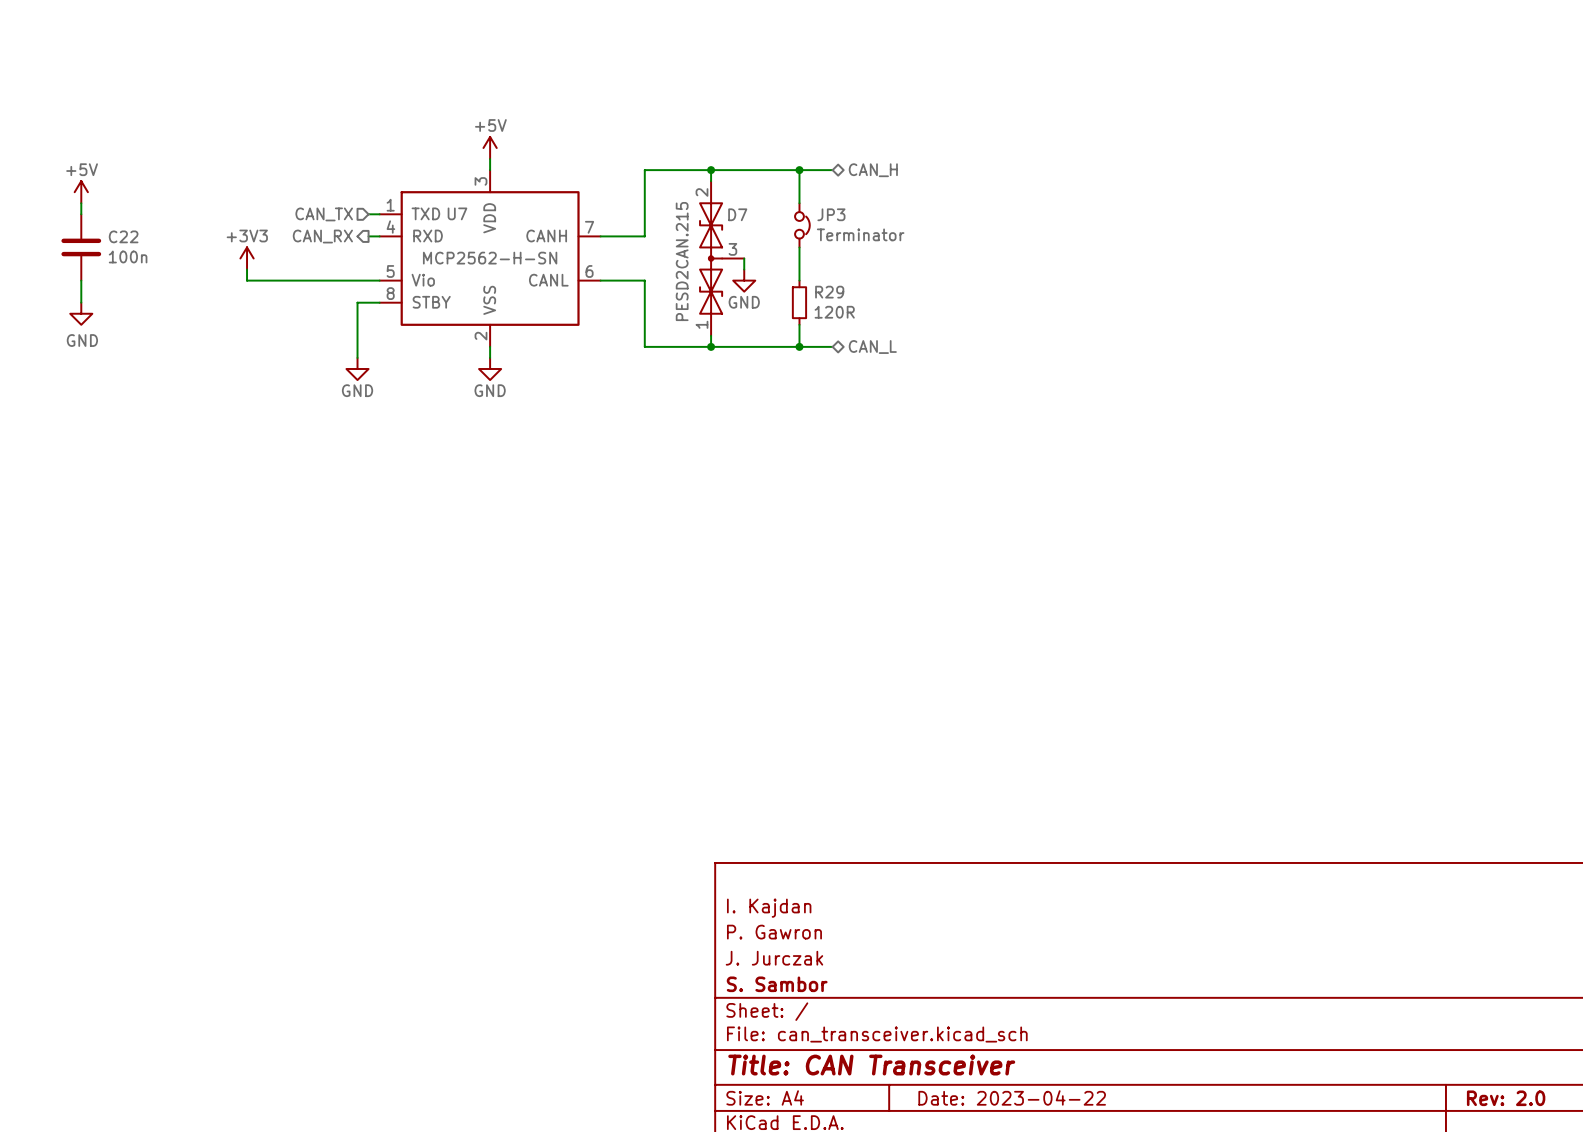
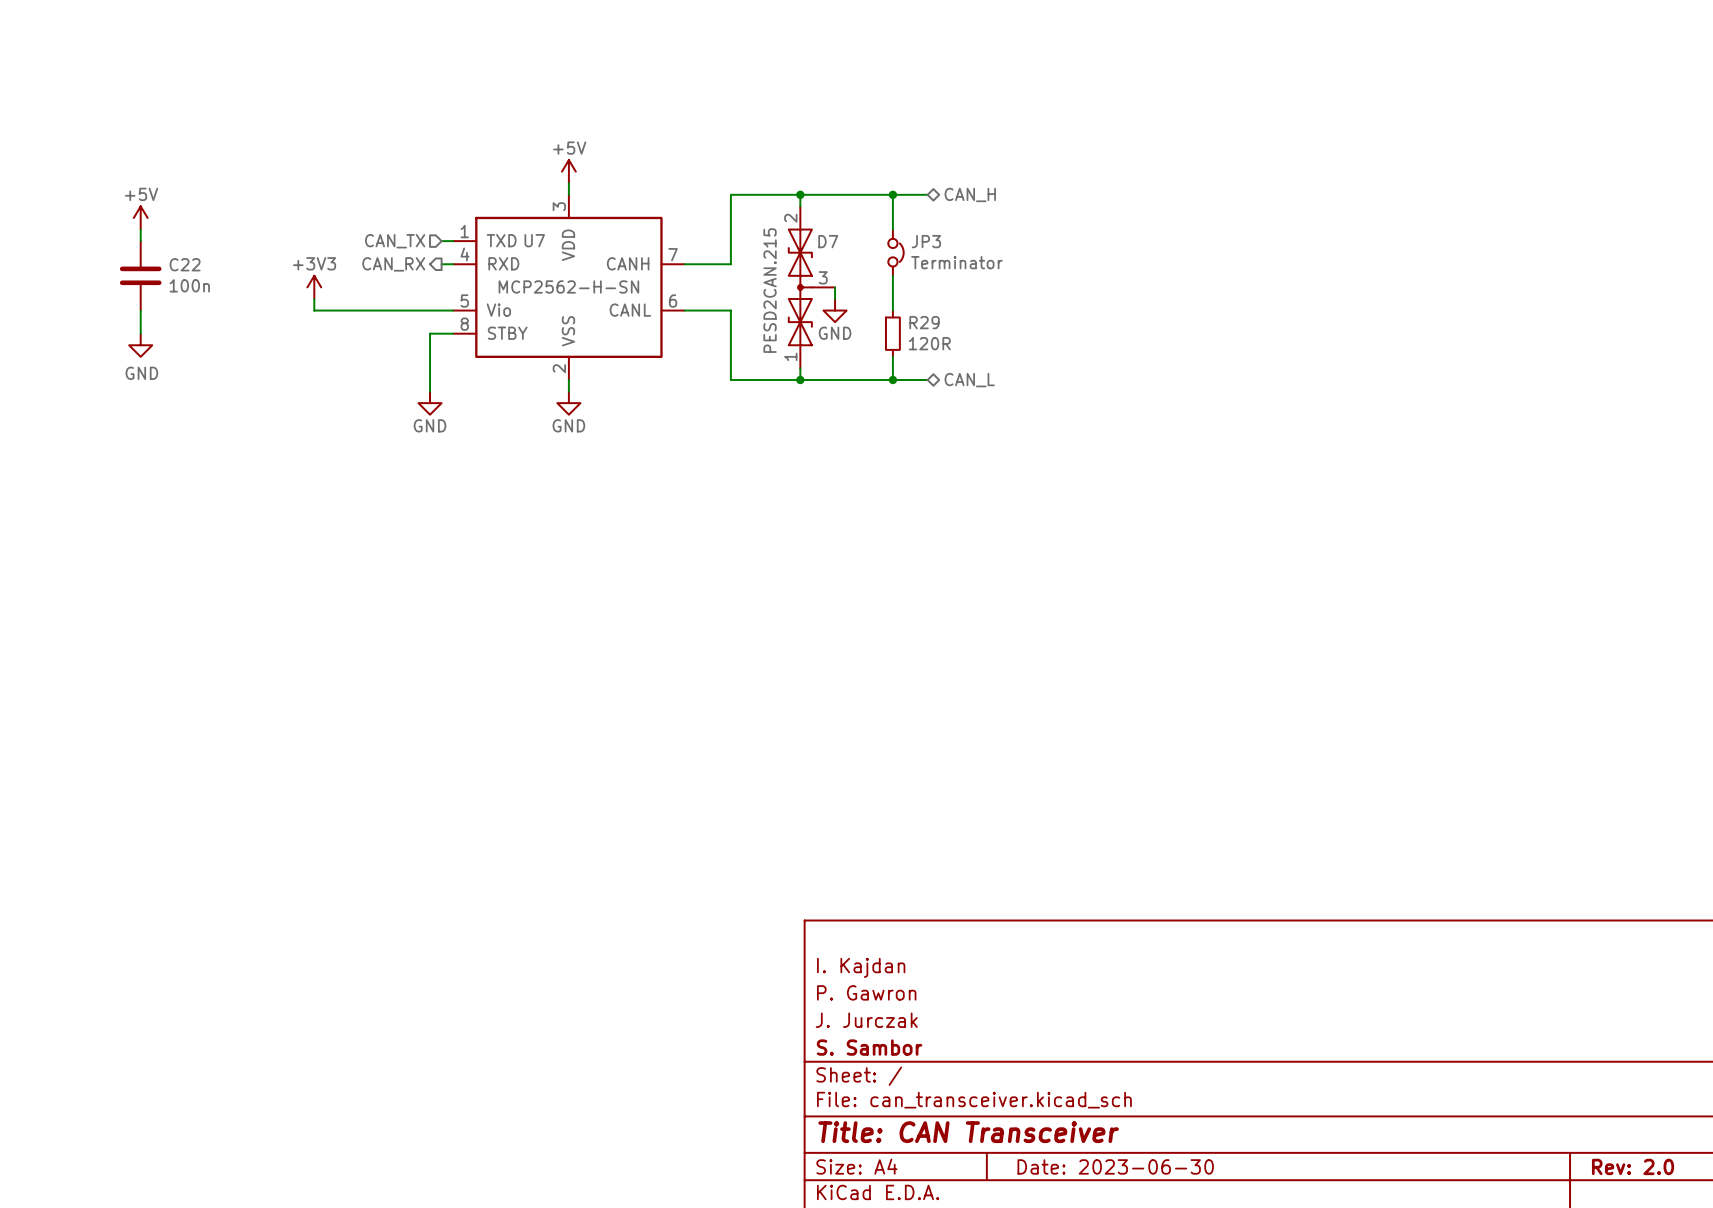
title block: Date: 2023-04-22 (1012, 1097) -> Date: 2023-06-30 (1115, 1166)

